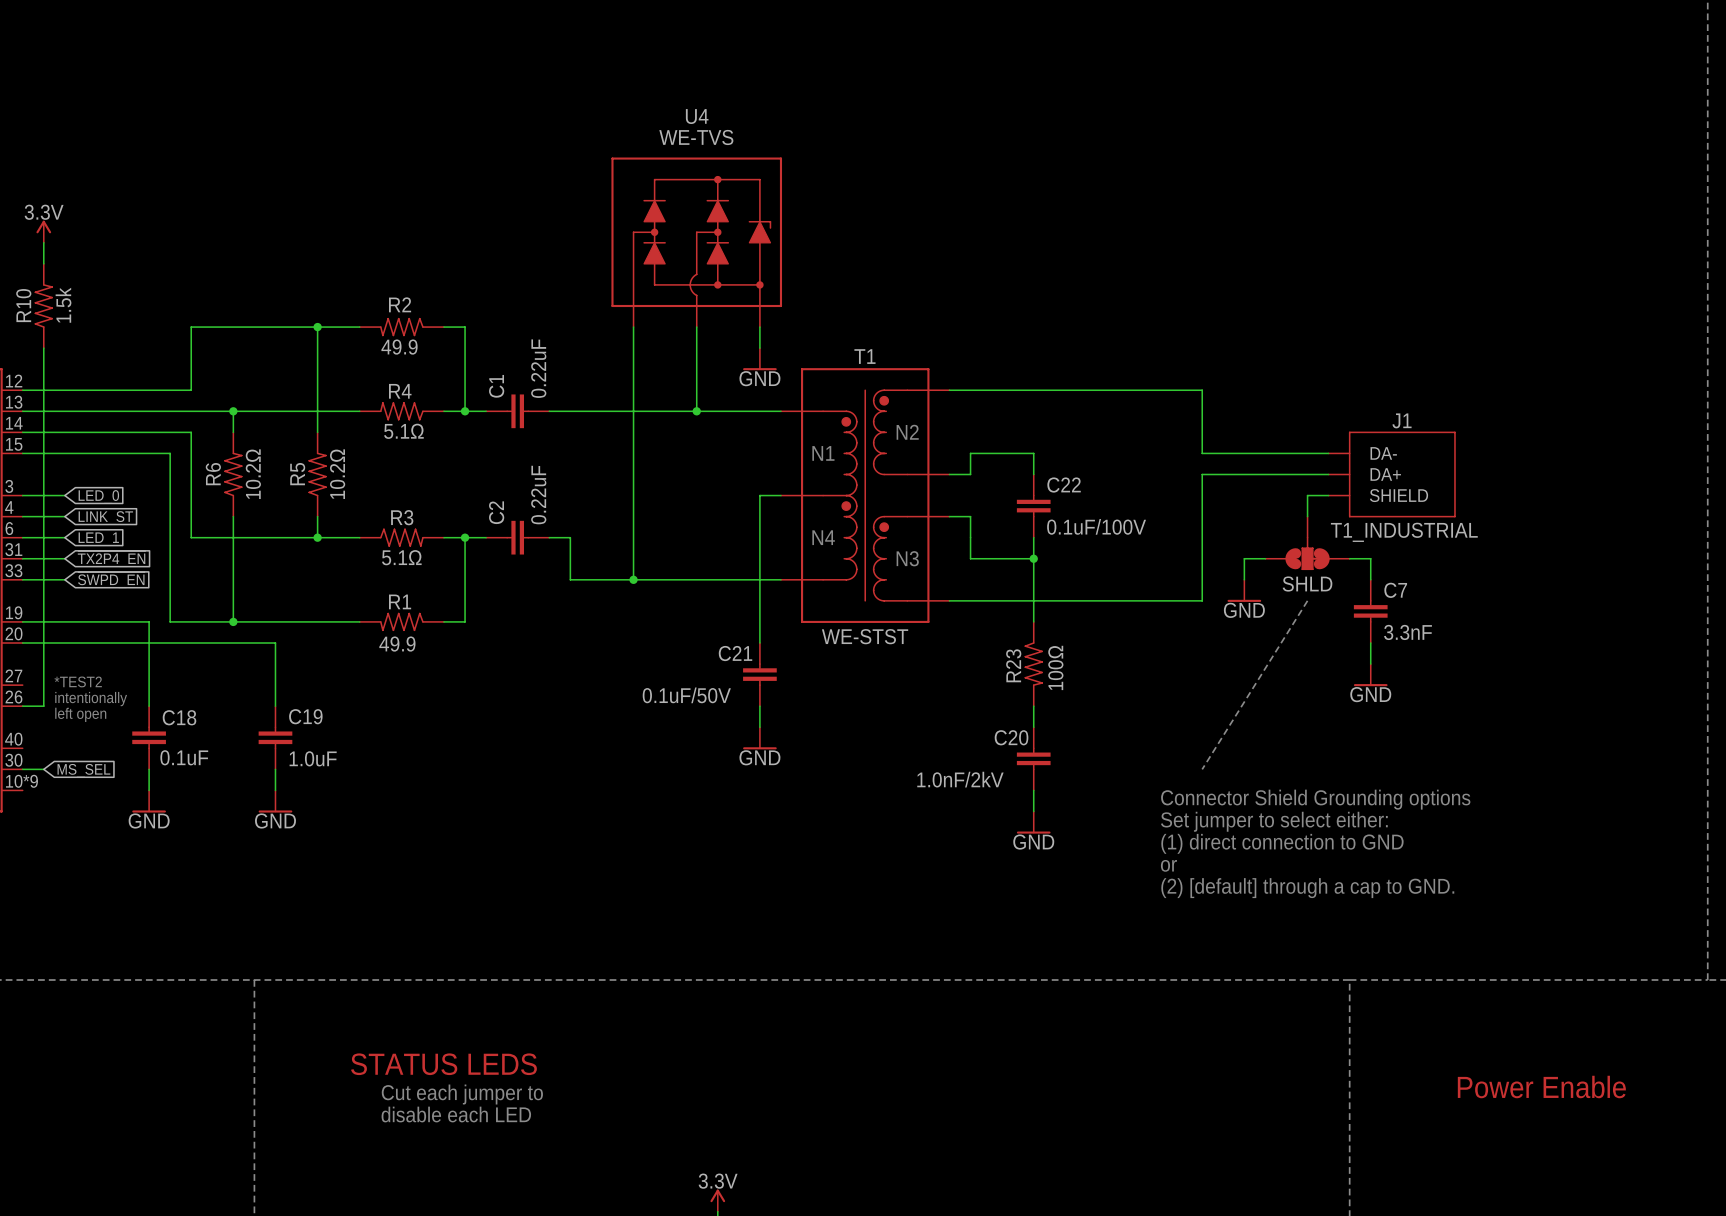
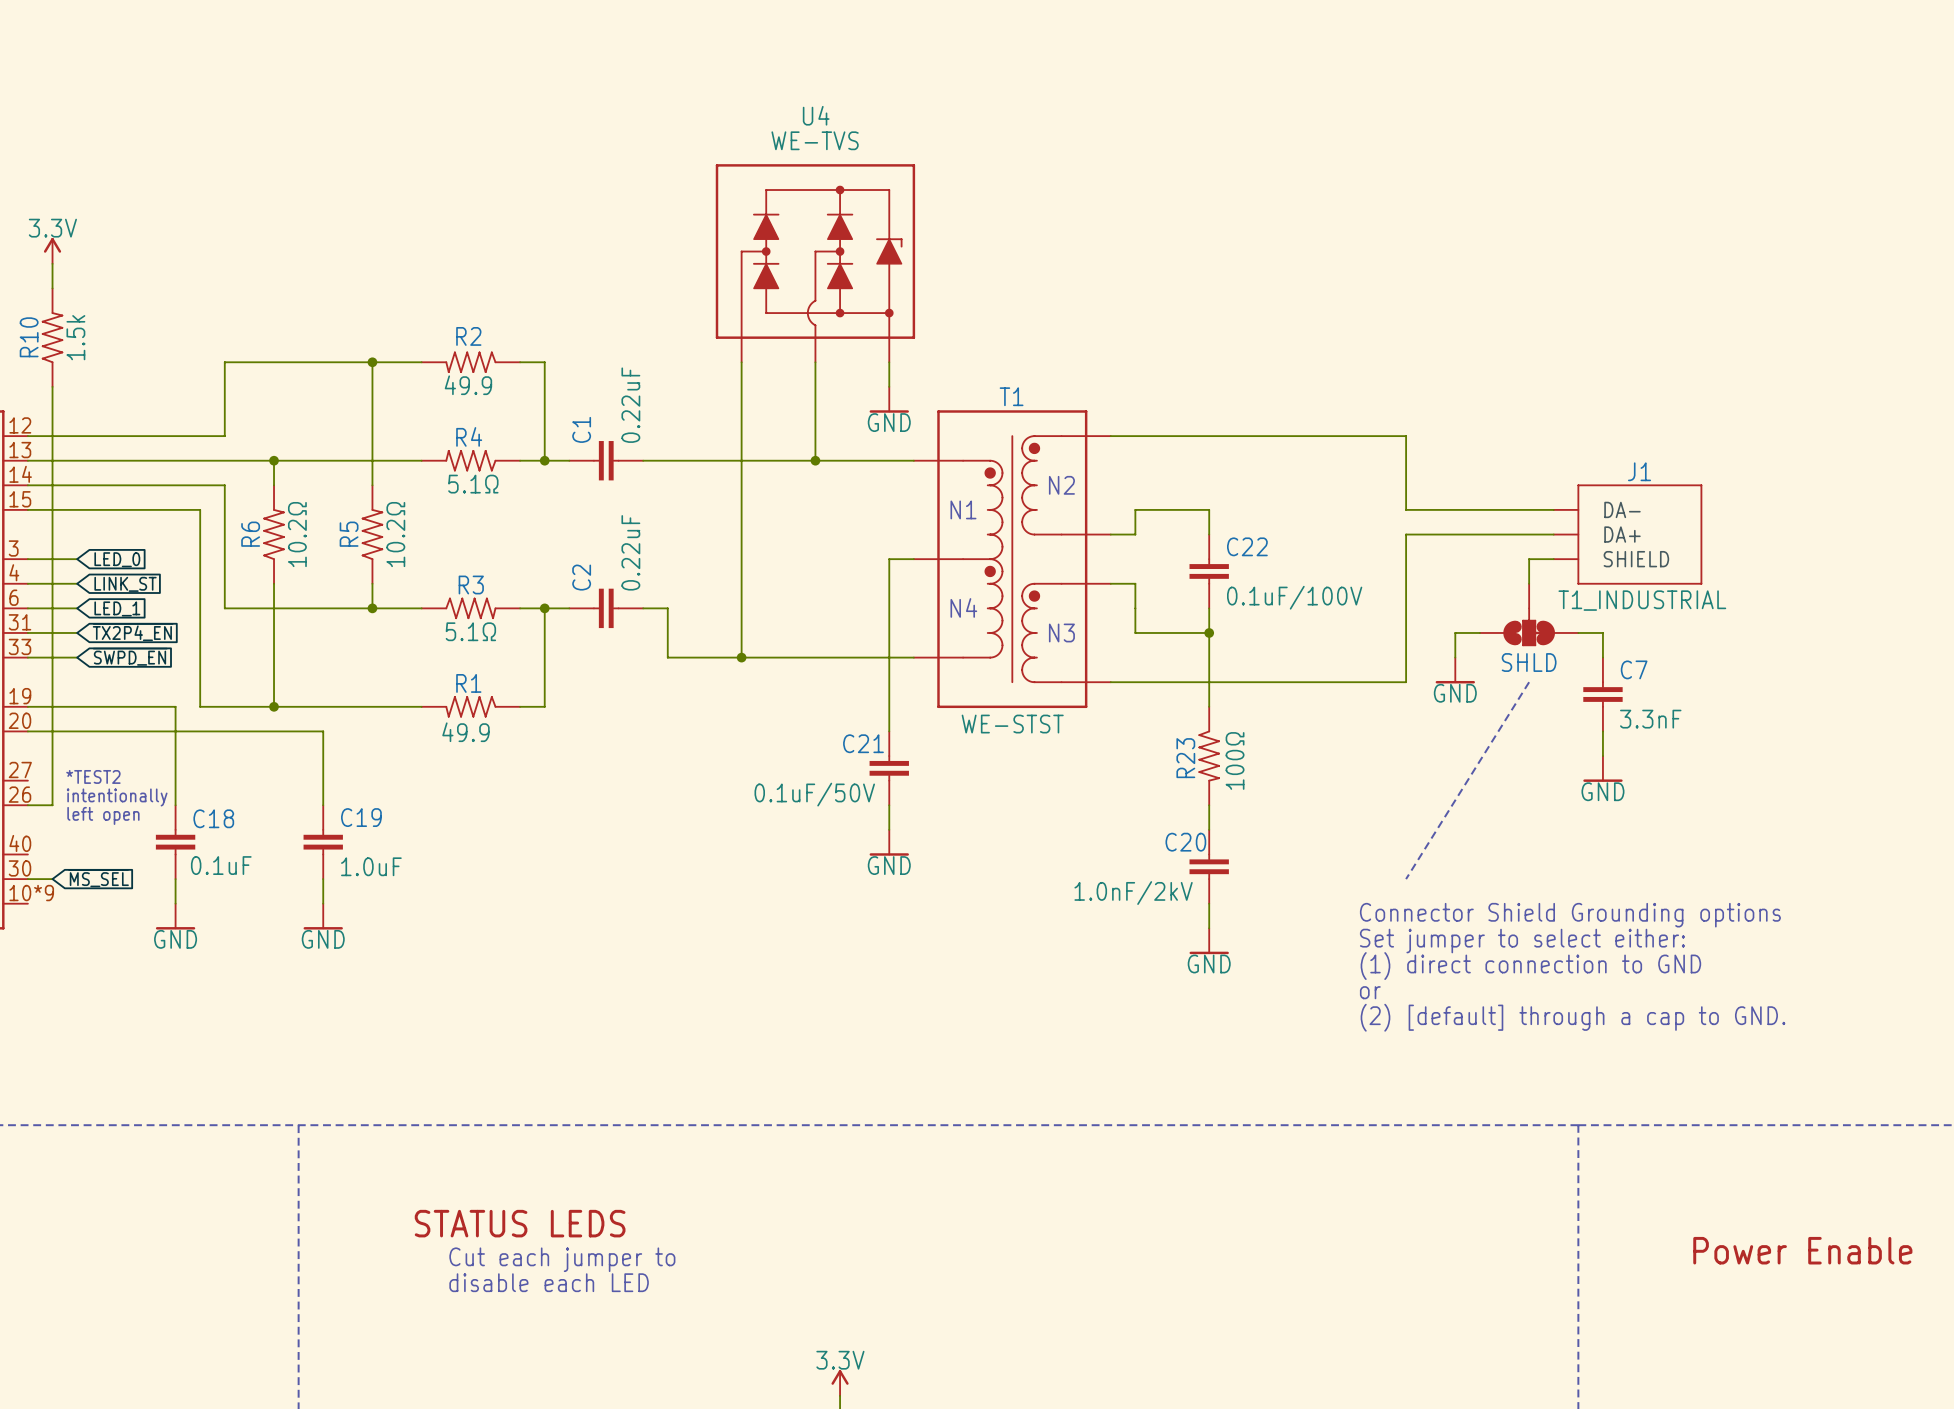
global label: MS_SEL (83, 770) -> ~{MS_SEL} (98, 878)

